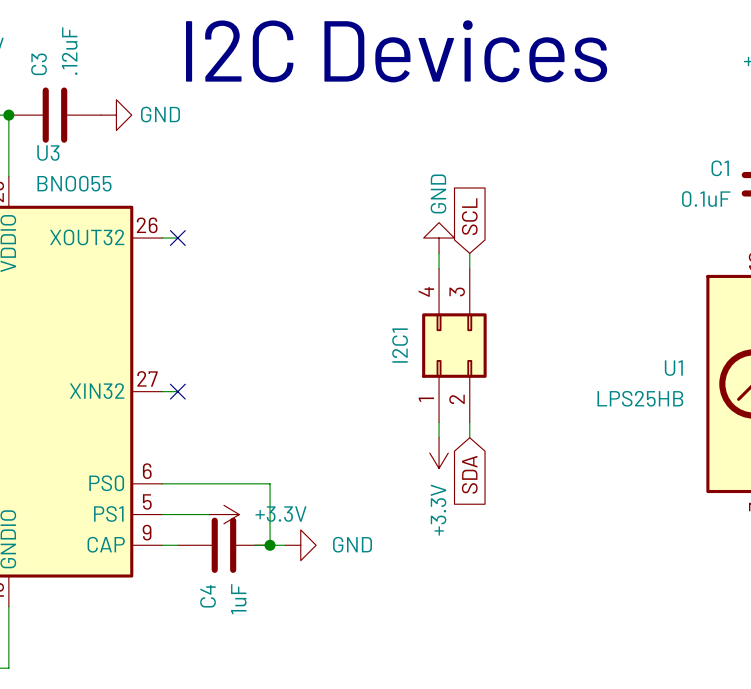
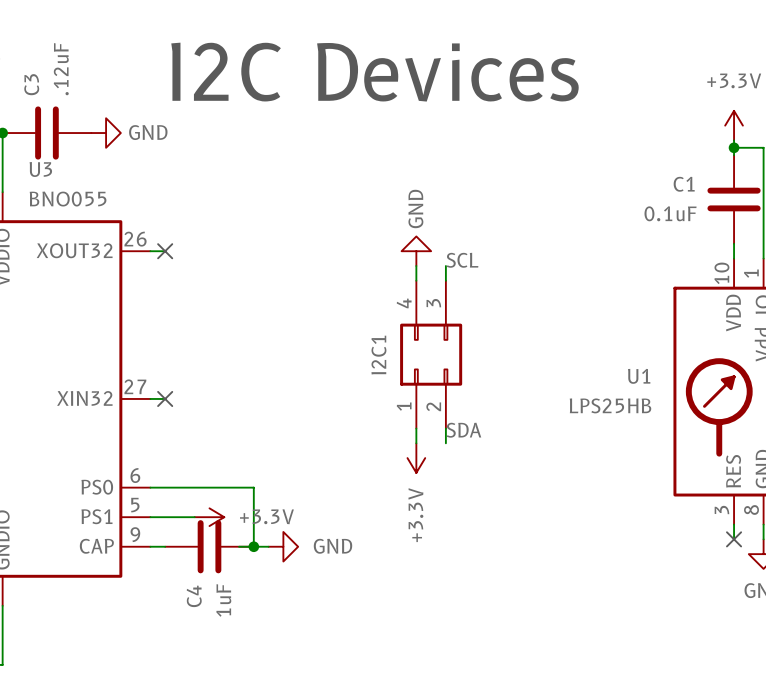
global label: SCL (469, 216) -> none
label: none -> SCL (462, 260)
label: none -> SDA (463, 430)
global label: SDA (469, 474) -> none

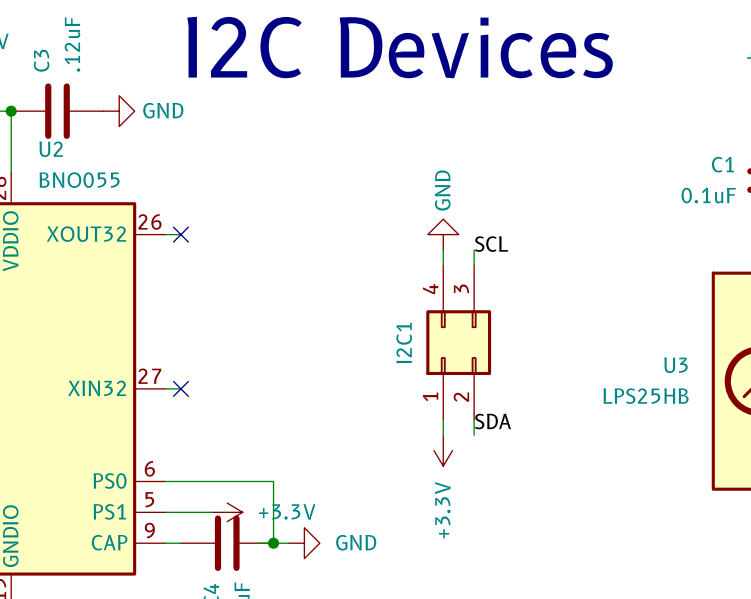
U3 name: U3 (40, 169) -> U2 (51, 149)
U1 name: U1 (639, 376) -> U3 (675, 365)

